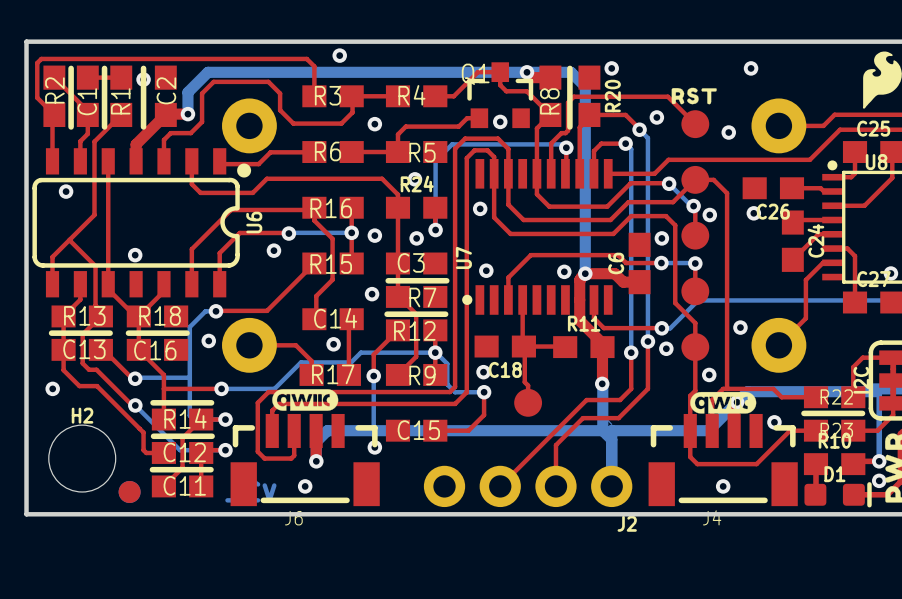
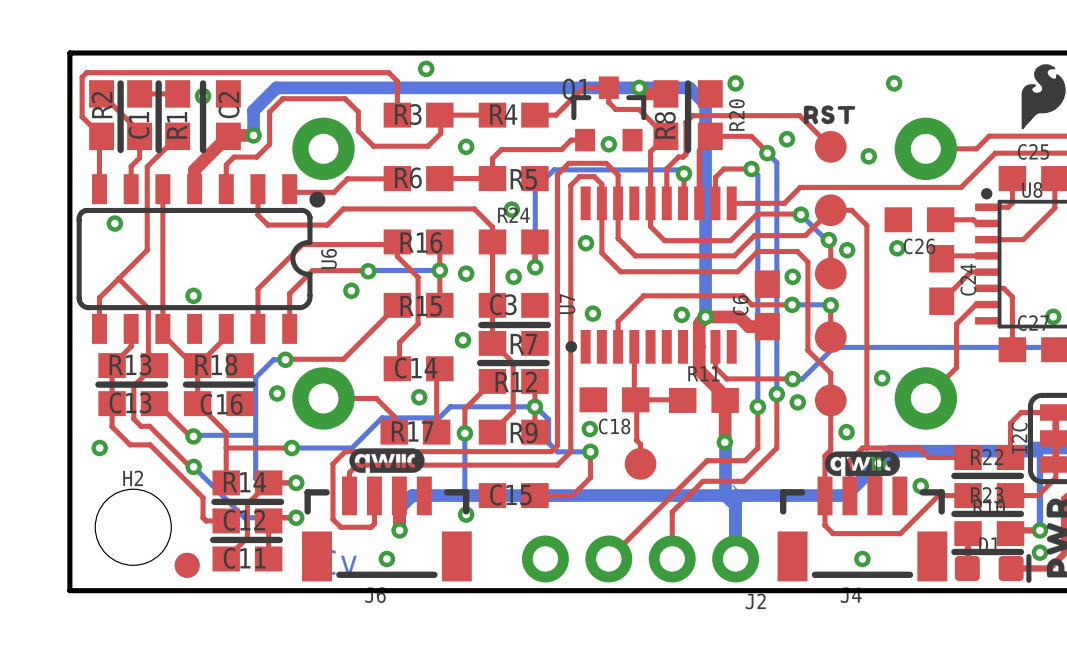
line: (153, 402) (211, 402) -> none
line: none -> (954, 513) (1020, 513)
line: none -> (954, 551) (1020, 551)

